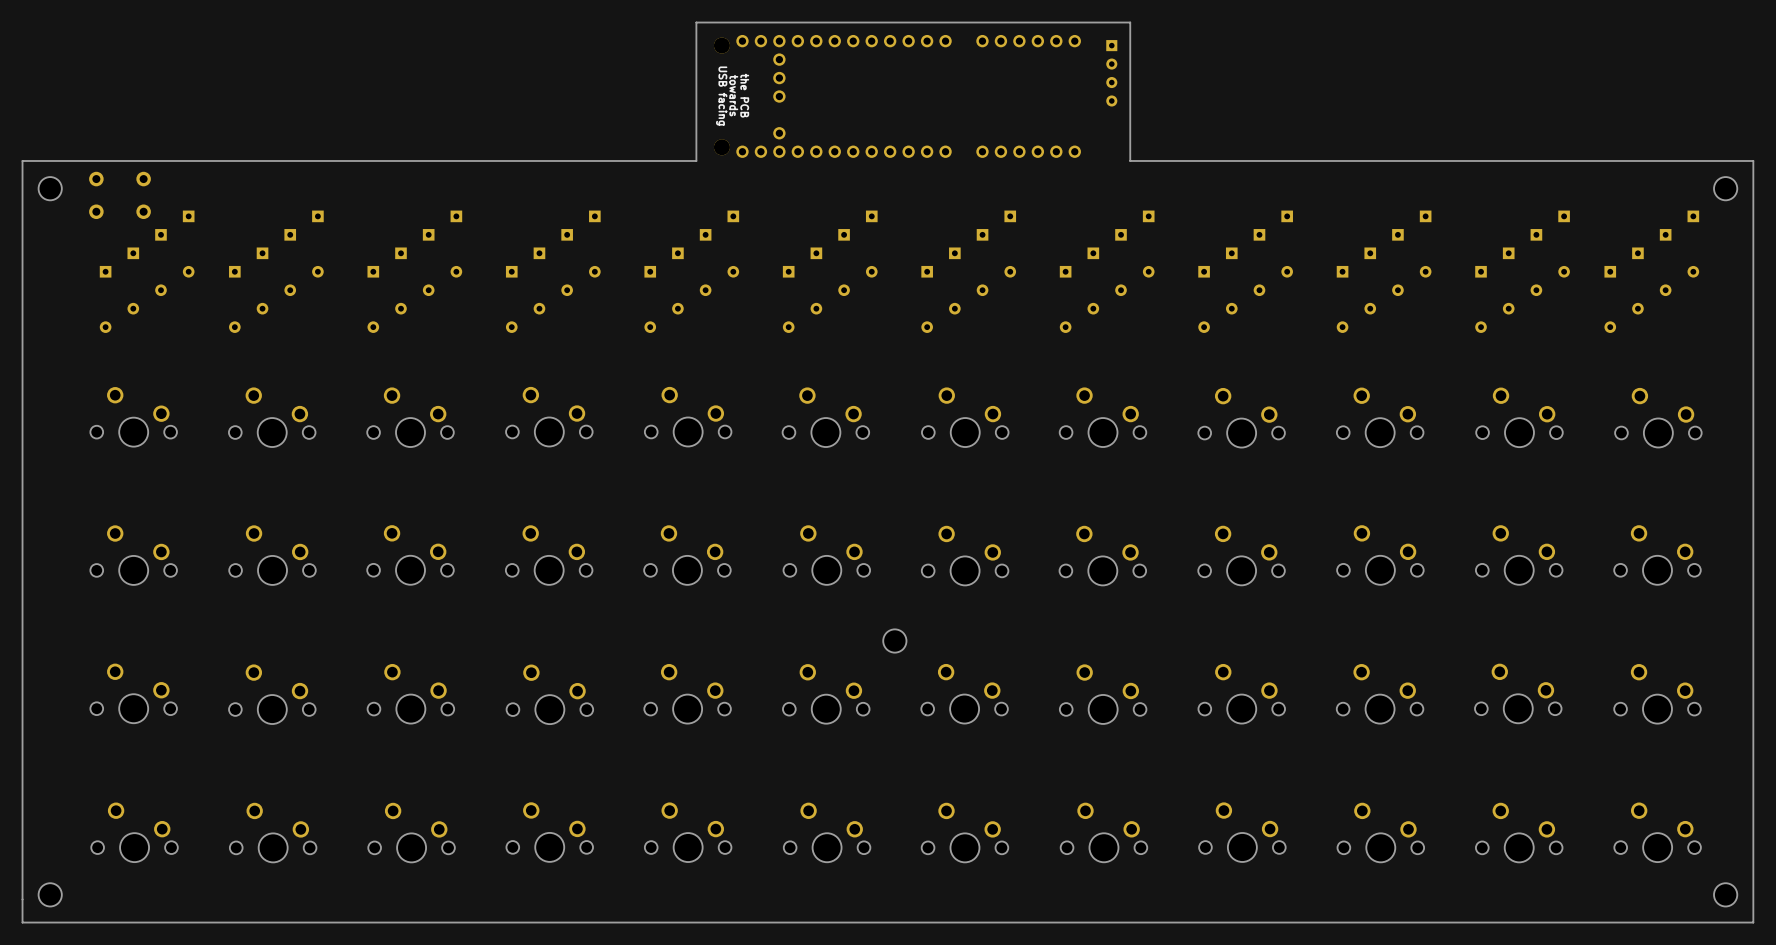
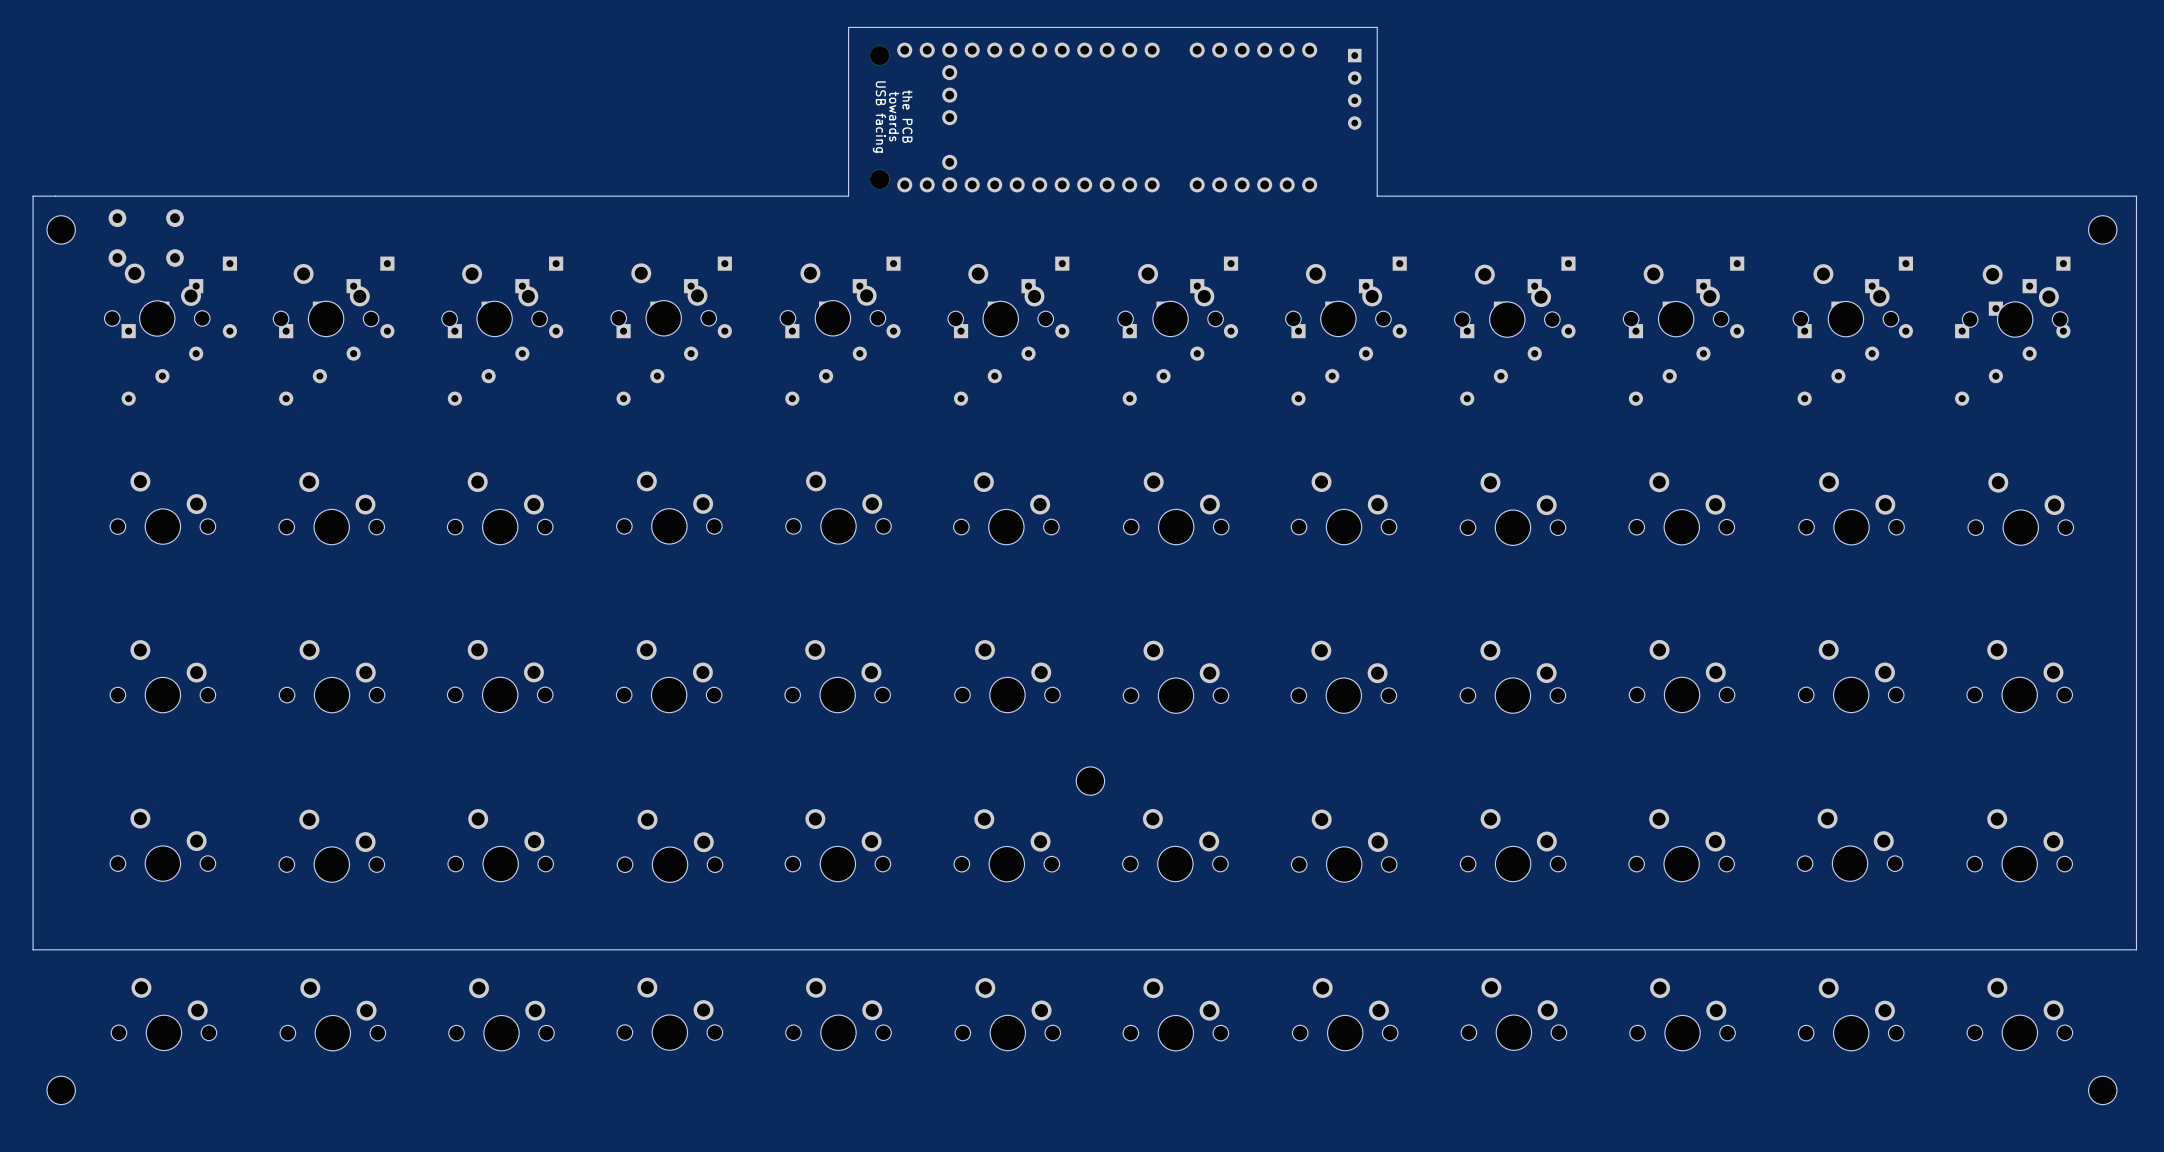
board edge: (27, 160) (22, 160) (22, 922) (1753, 922) (1753, 779) -> (33, 196) (33, 949) (2136, 949)
part: none -> (663, 299)
part: none -> (832, 299)
part: none -> (157, 299)
part: none -> (326, 300)
part: none -> (494, 300)
part: none -> (1000, 300)
part: none -> (1170, 300)
part: none -> (1338, 300)
part: none -> (1507, 300)
part: none -> (1676, 300)
part: none -> (1845, 300)
part: none -> (2015, 300)

